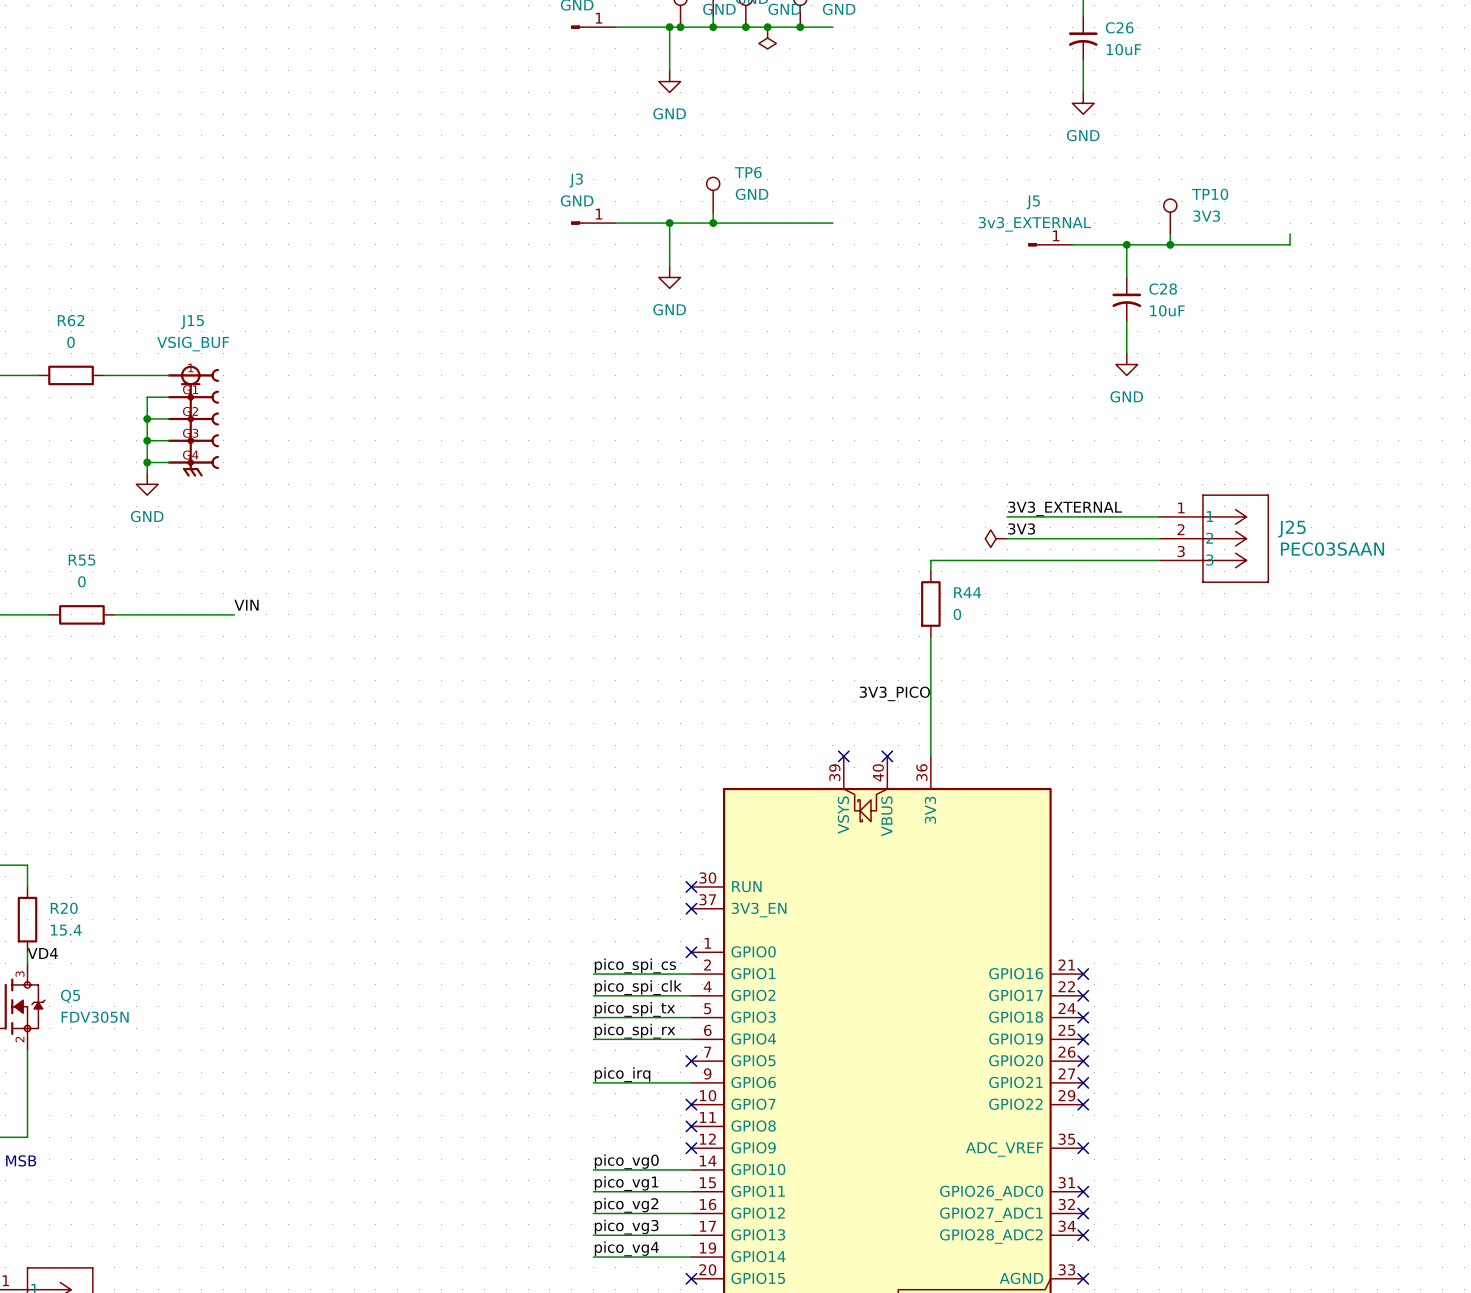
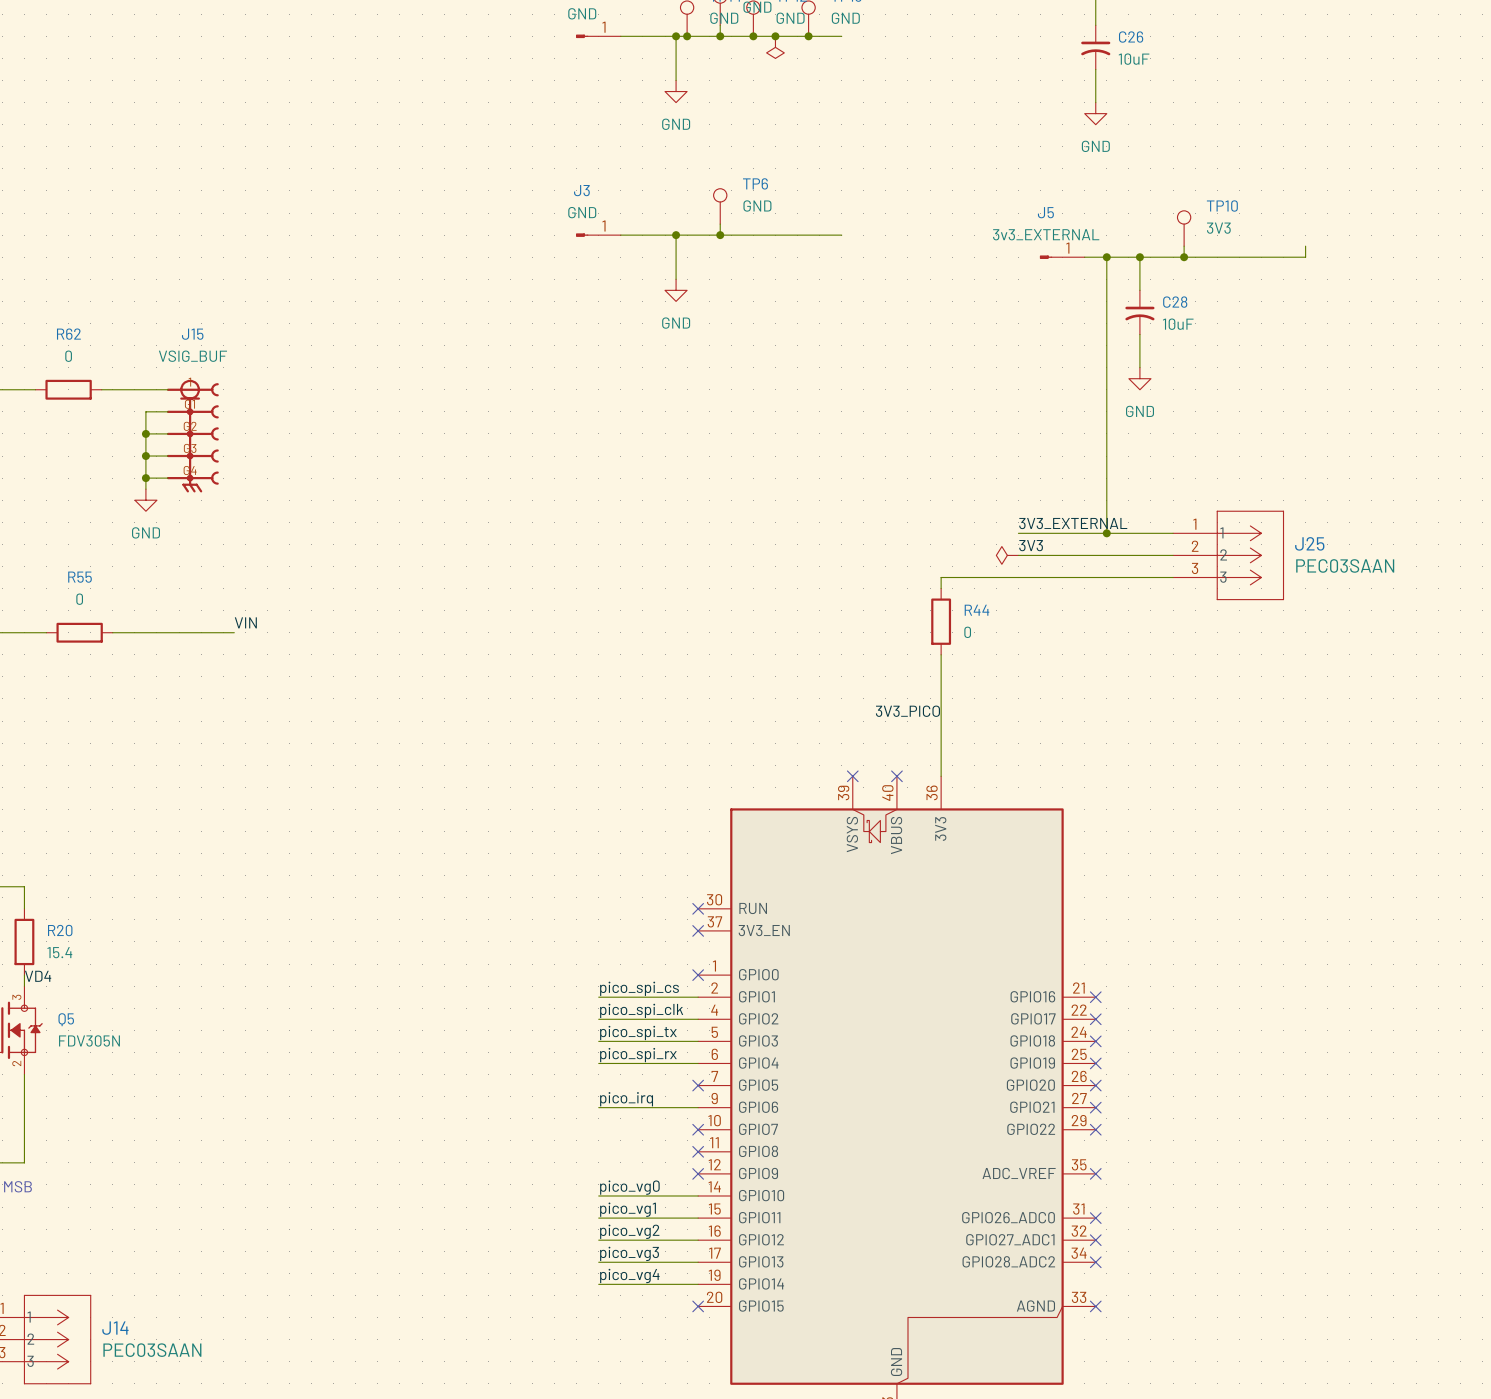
wire: none -> (1106, 257) (1106, 533)
junction: none -> (1106, 257)
junction: none -> (1106, 533)

